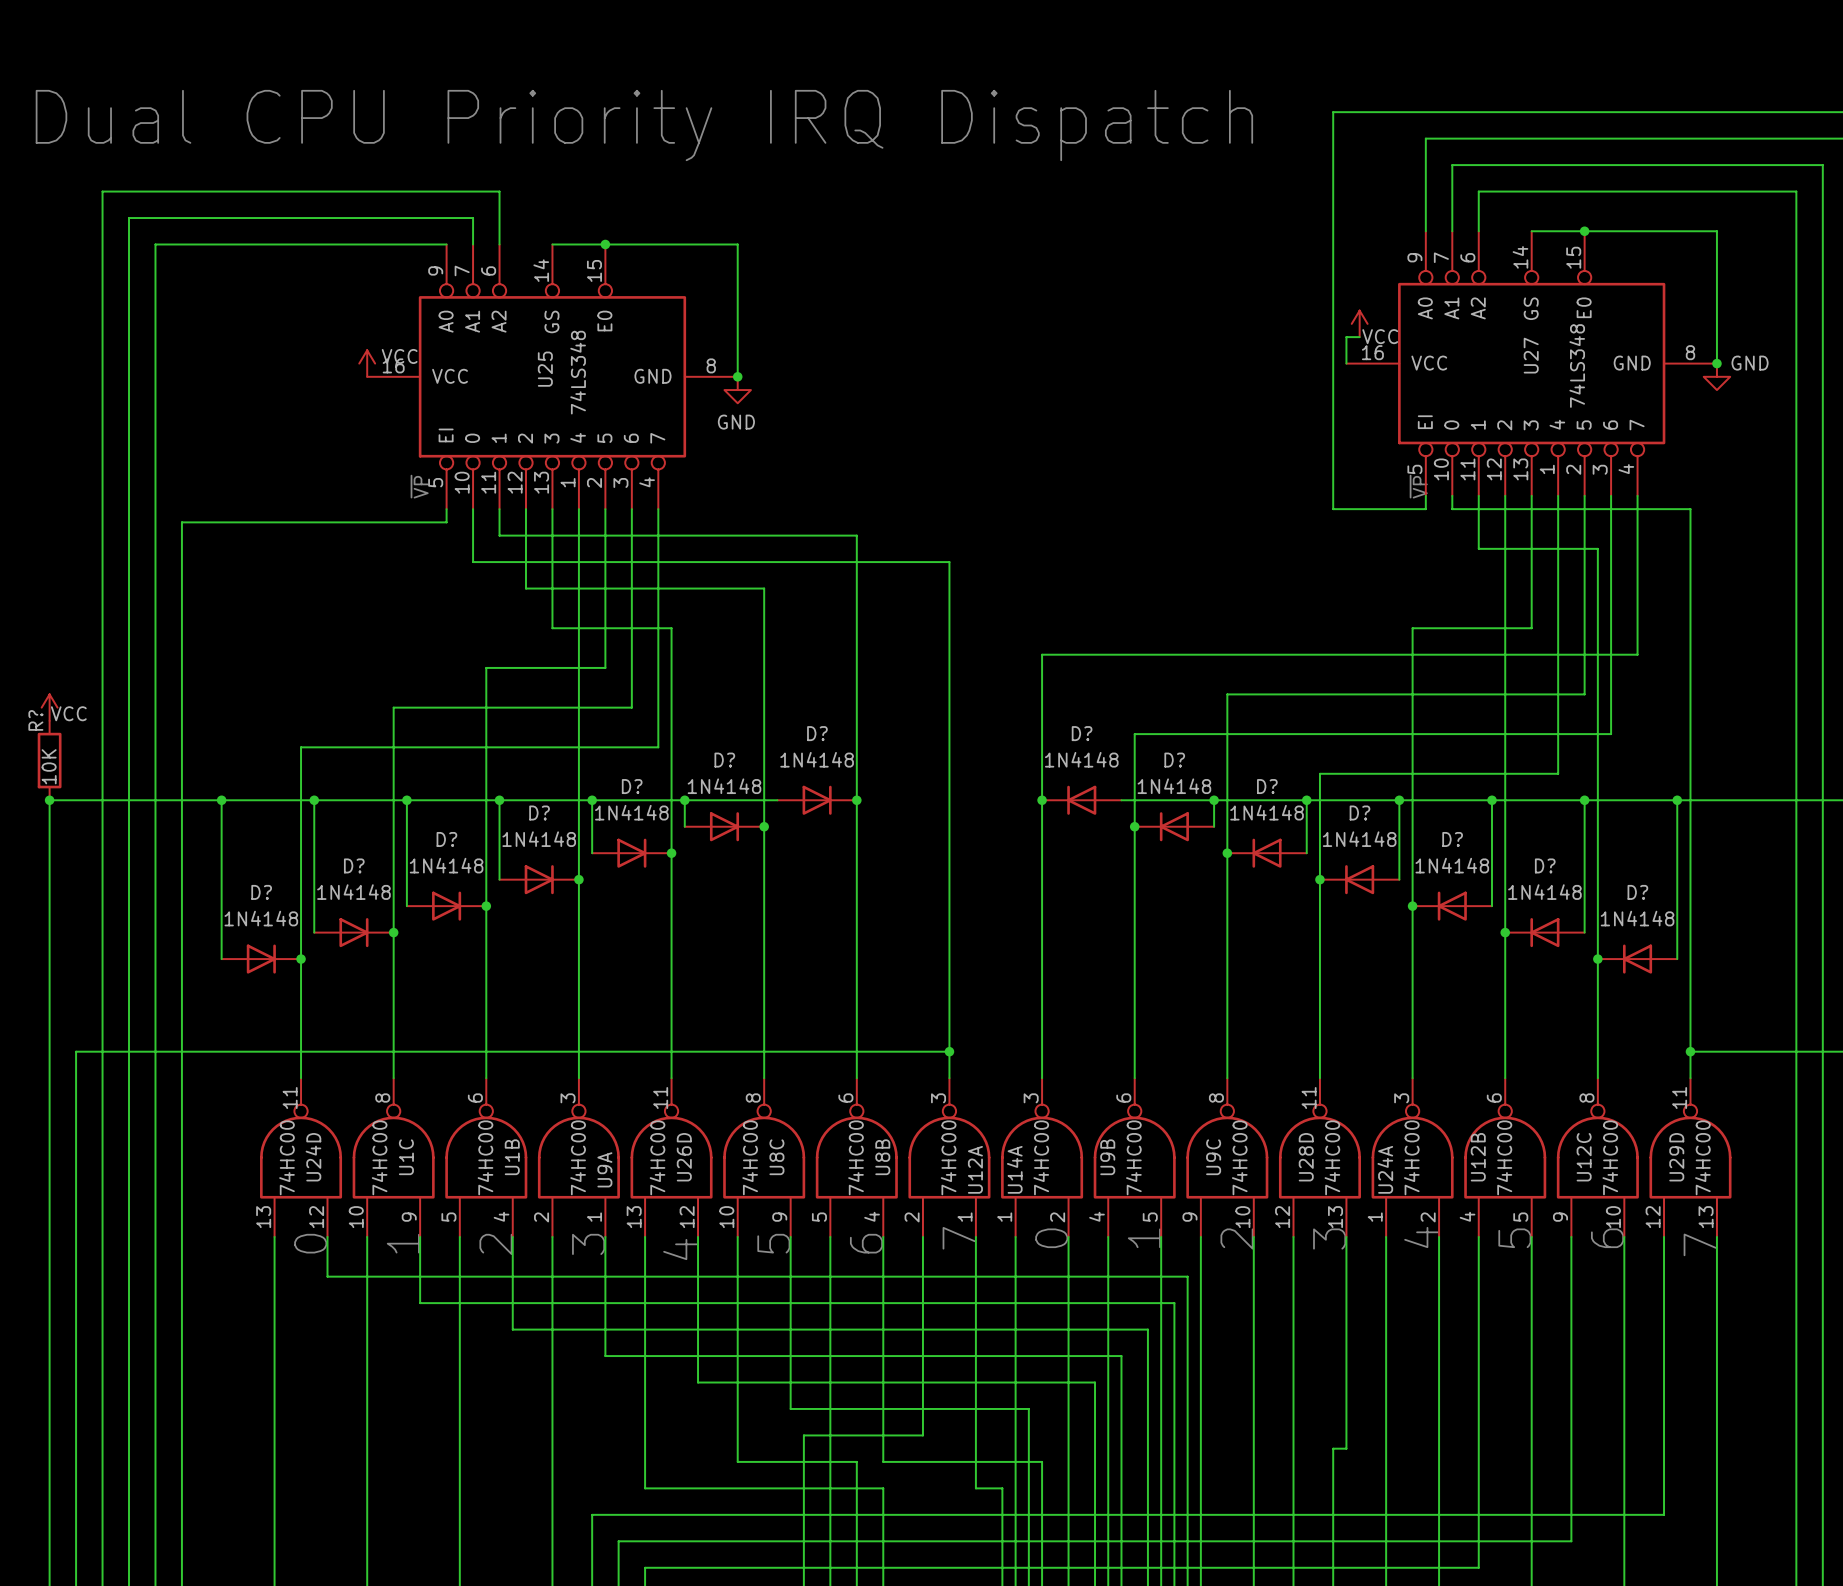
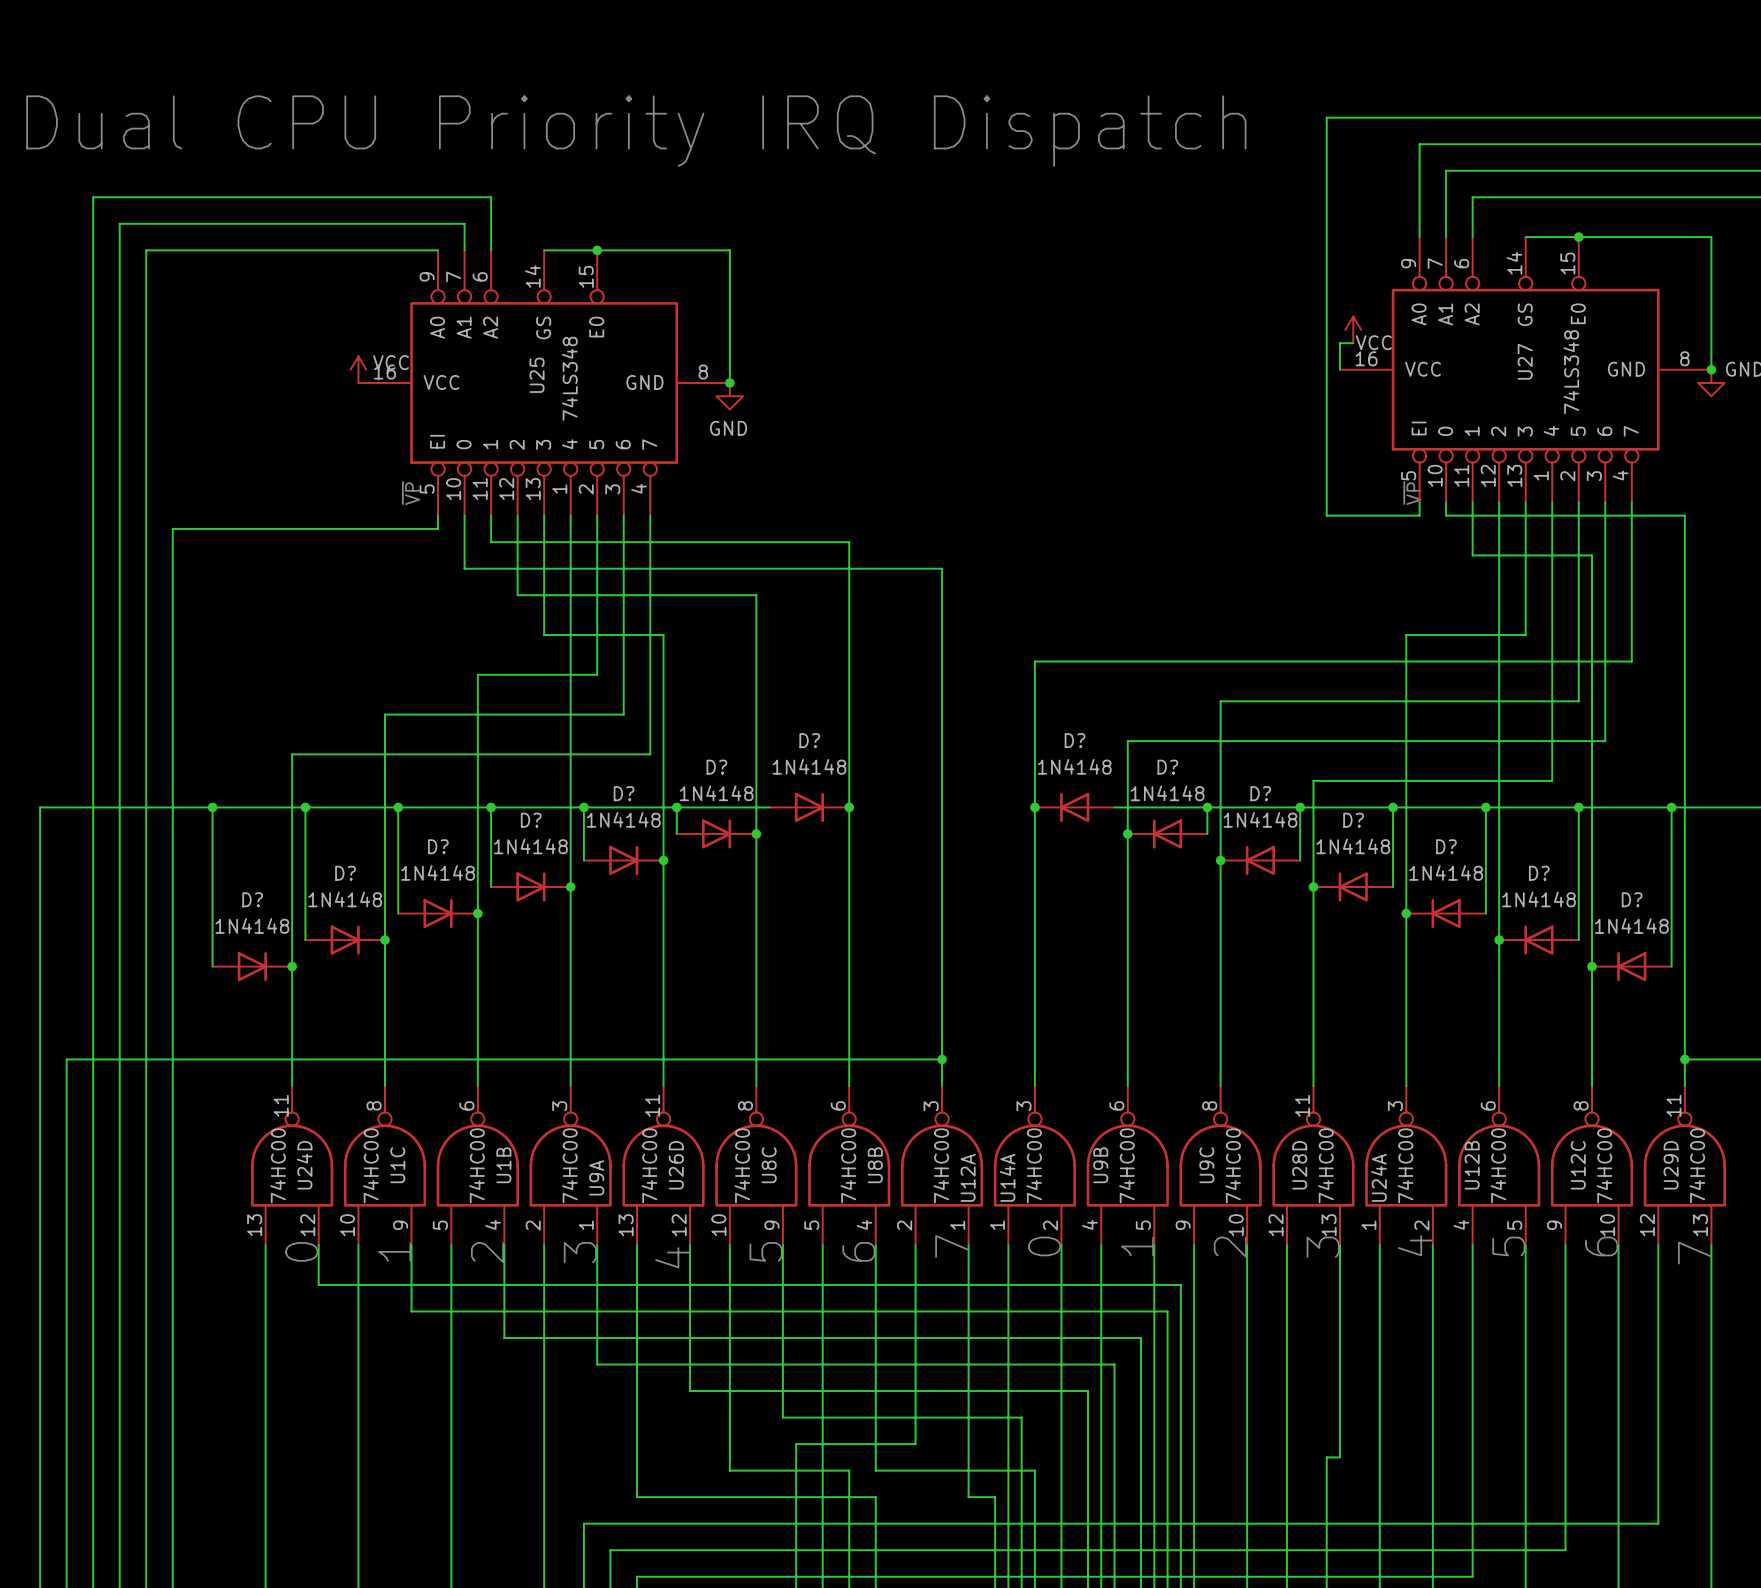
power symbol: VCC (49, 707) -> none
R?: 10K (49, 760) -> none
junction: (49, 800) -> none

